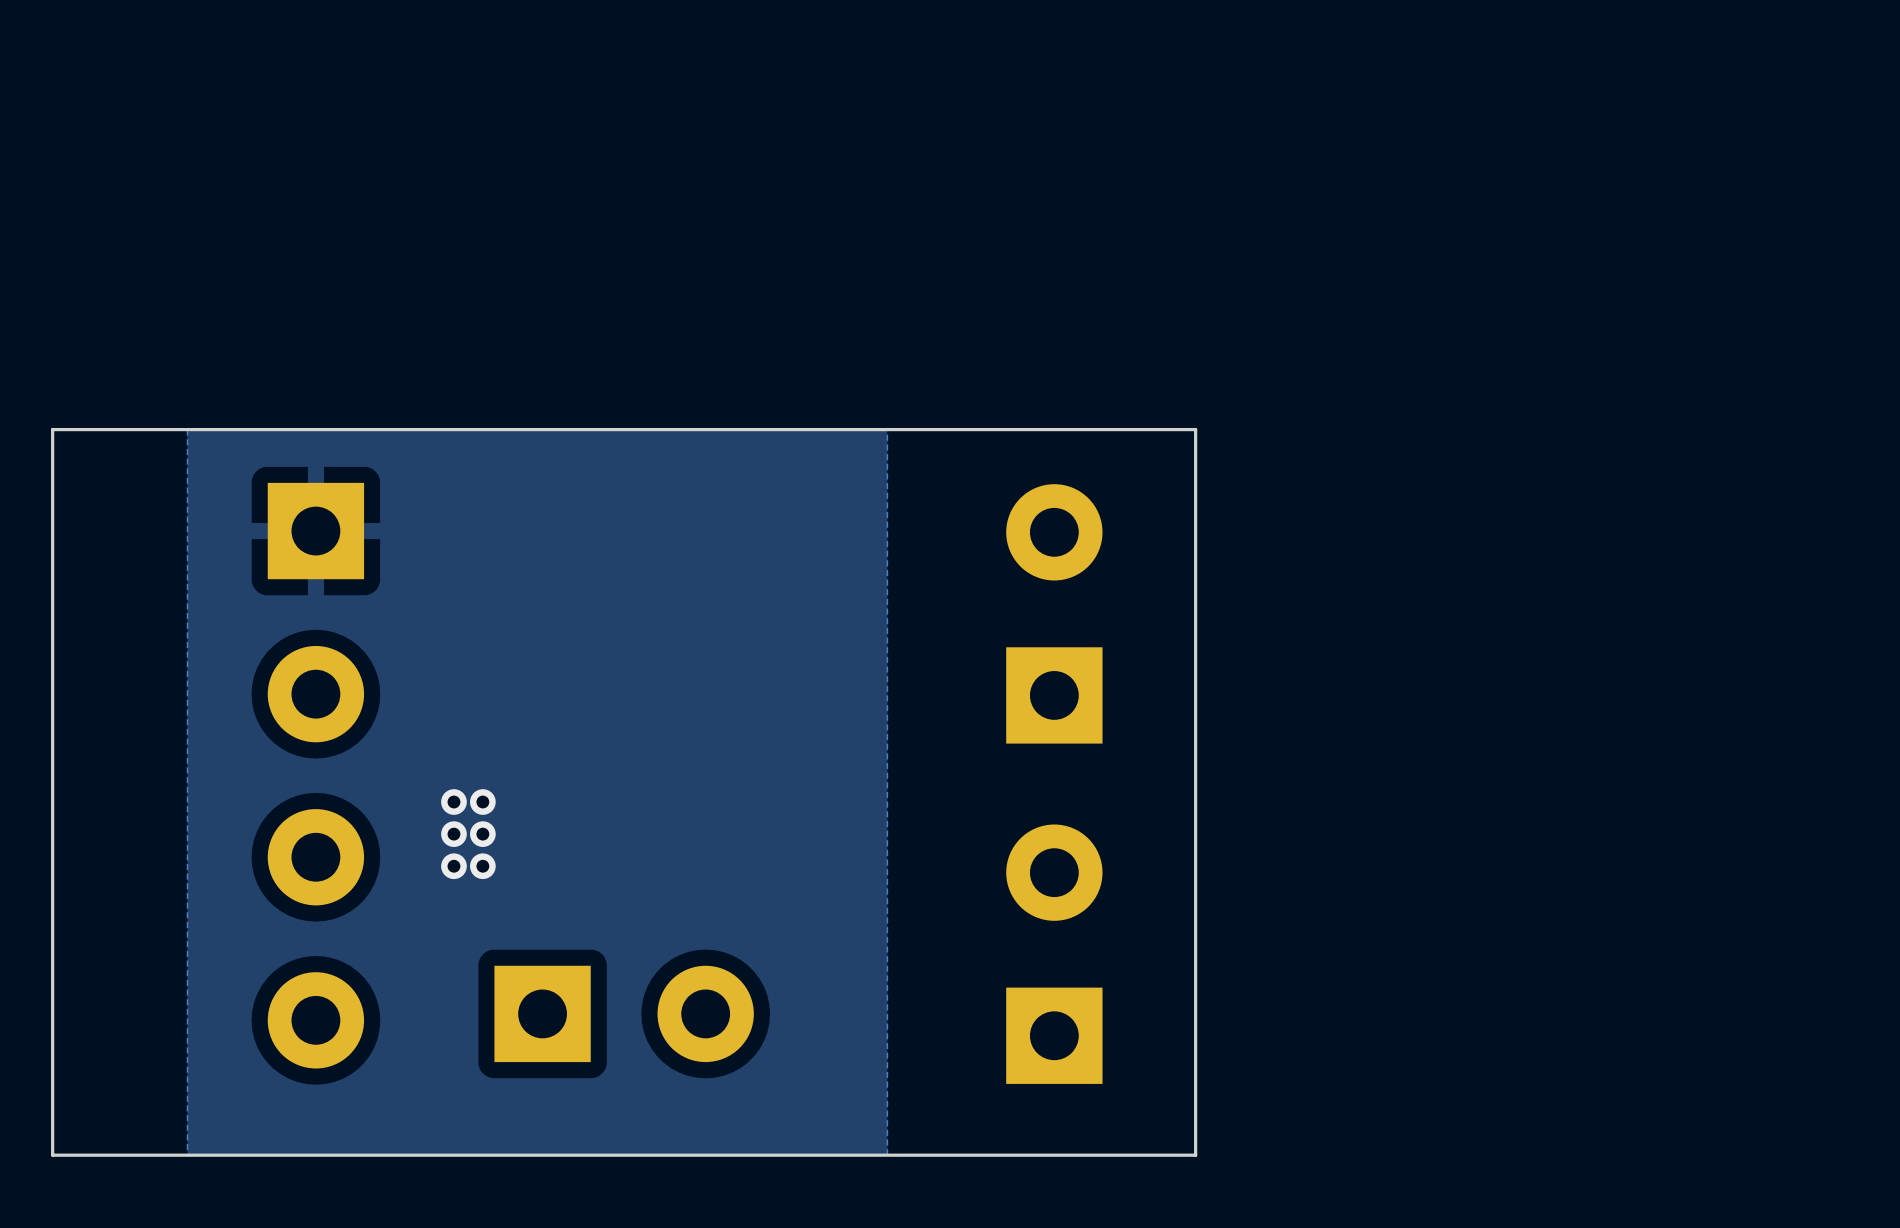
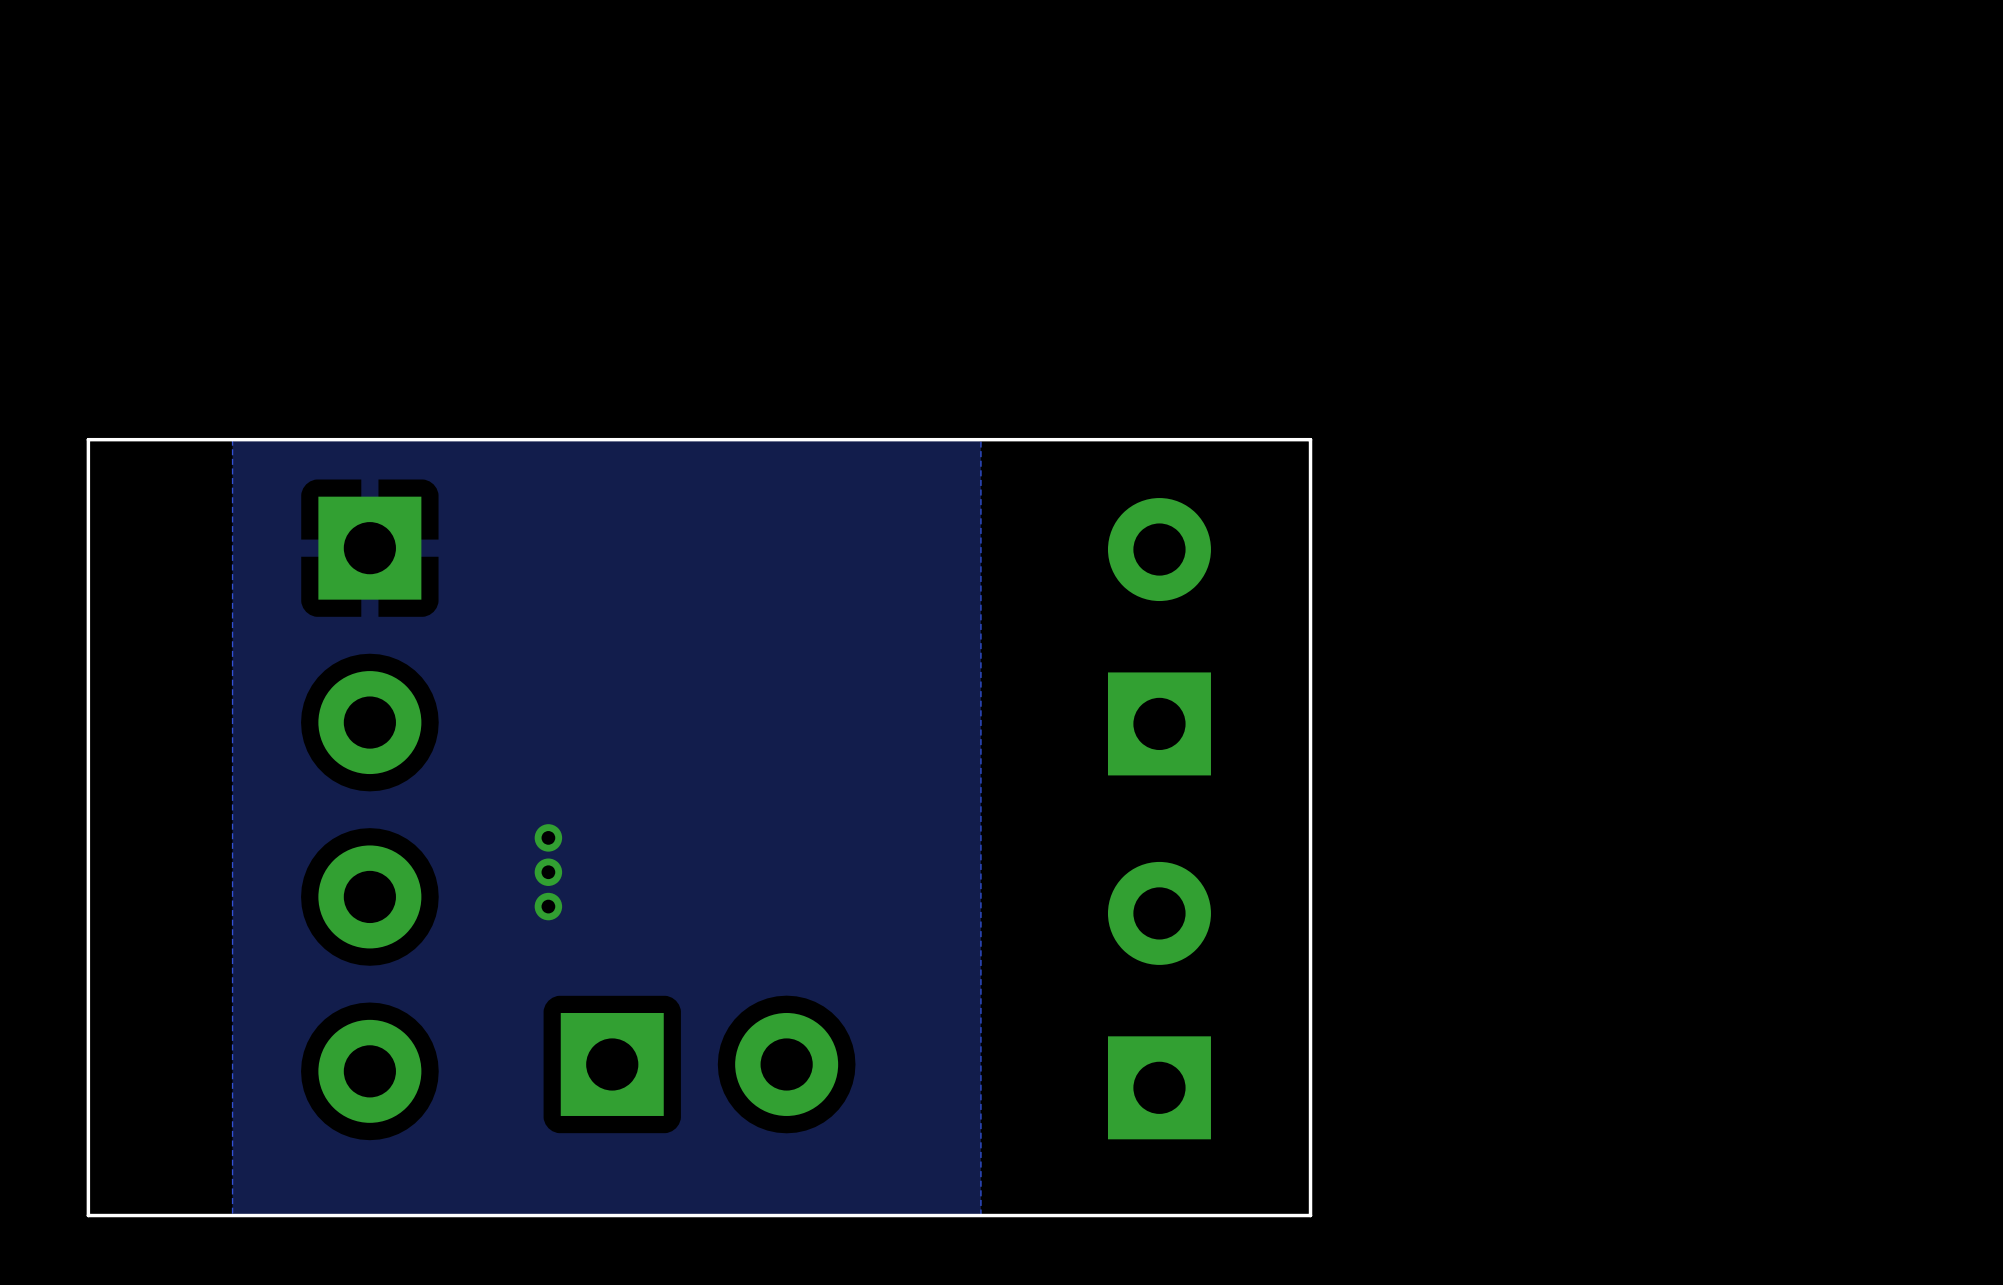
via: (453, 802) -> none
via: (453, 834) -> none
via: (453, 866) -> none

